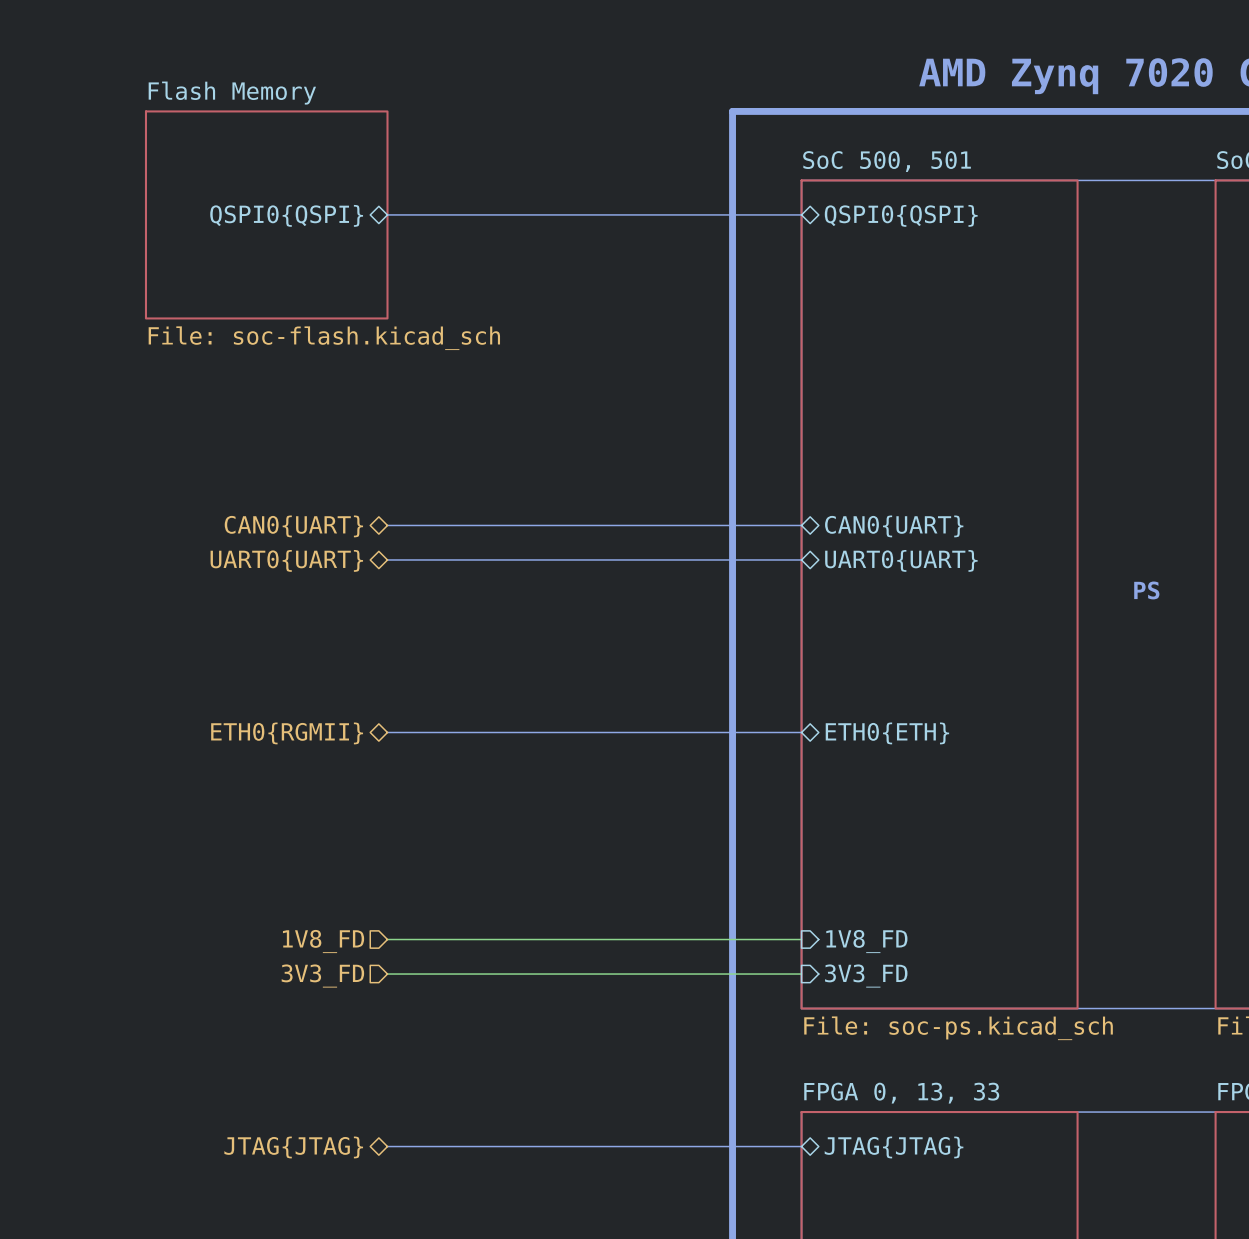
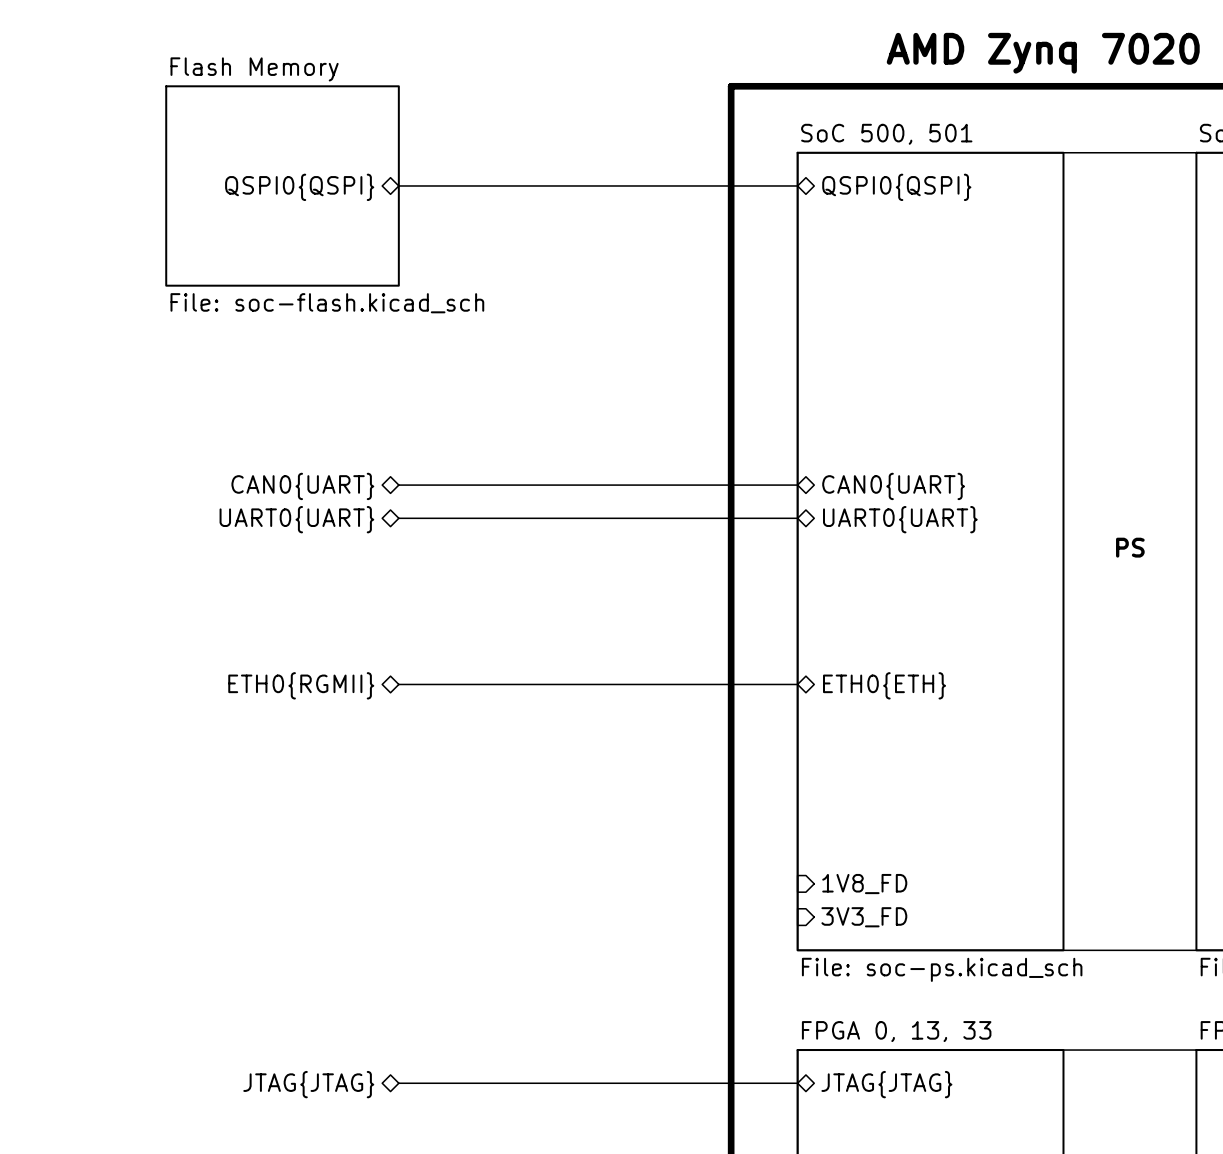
wire: (387, 939) (801, 939) -> none
hierarchical label: 1V8_FD (323, 941) -> none
wire: (387, 974) (801, 974) -> none
hierarchical label: 3V3_FD (322, 976) -> none

